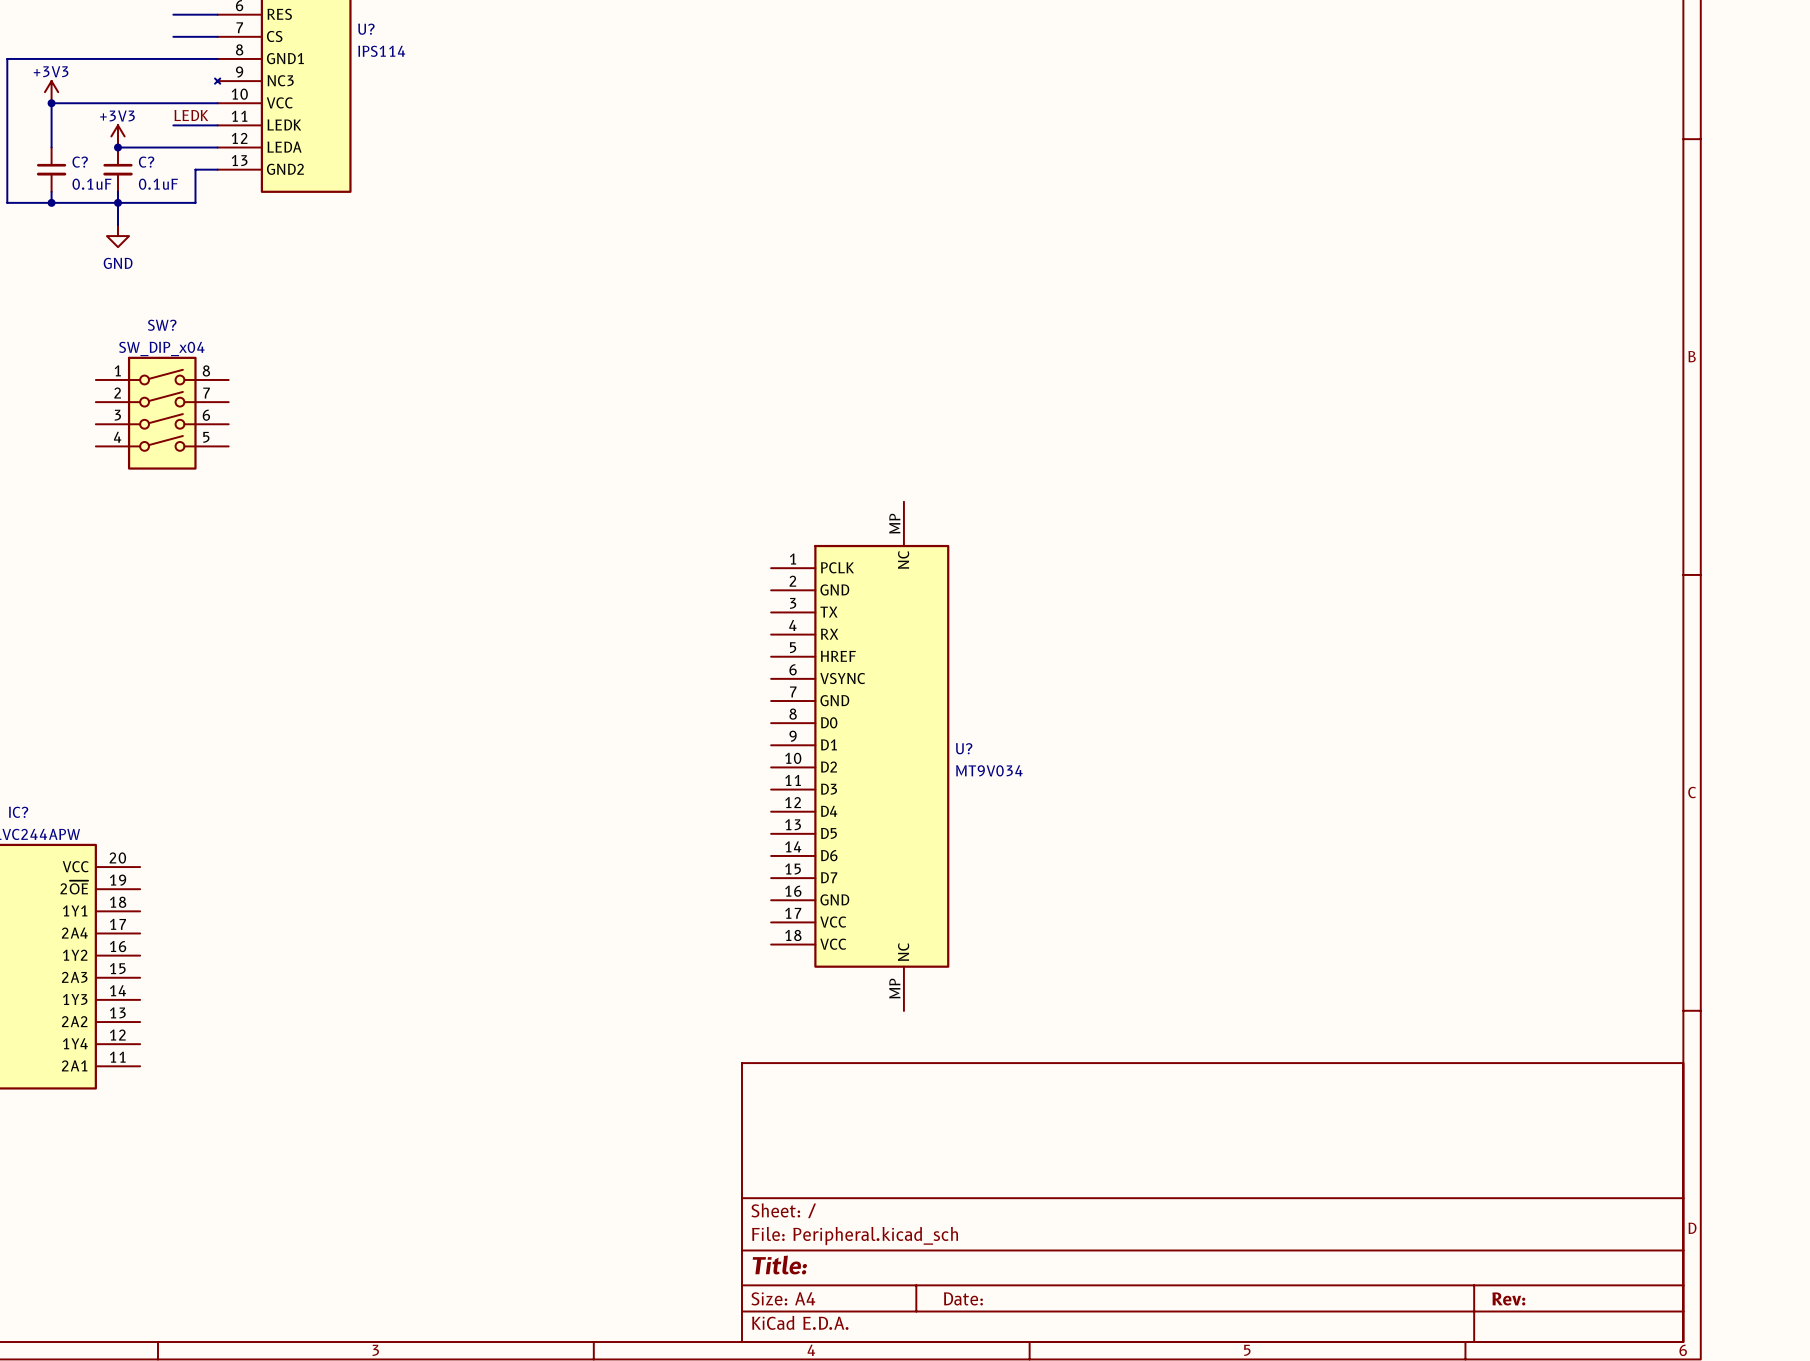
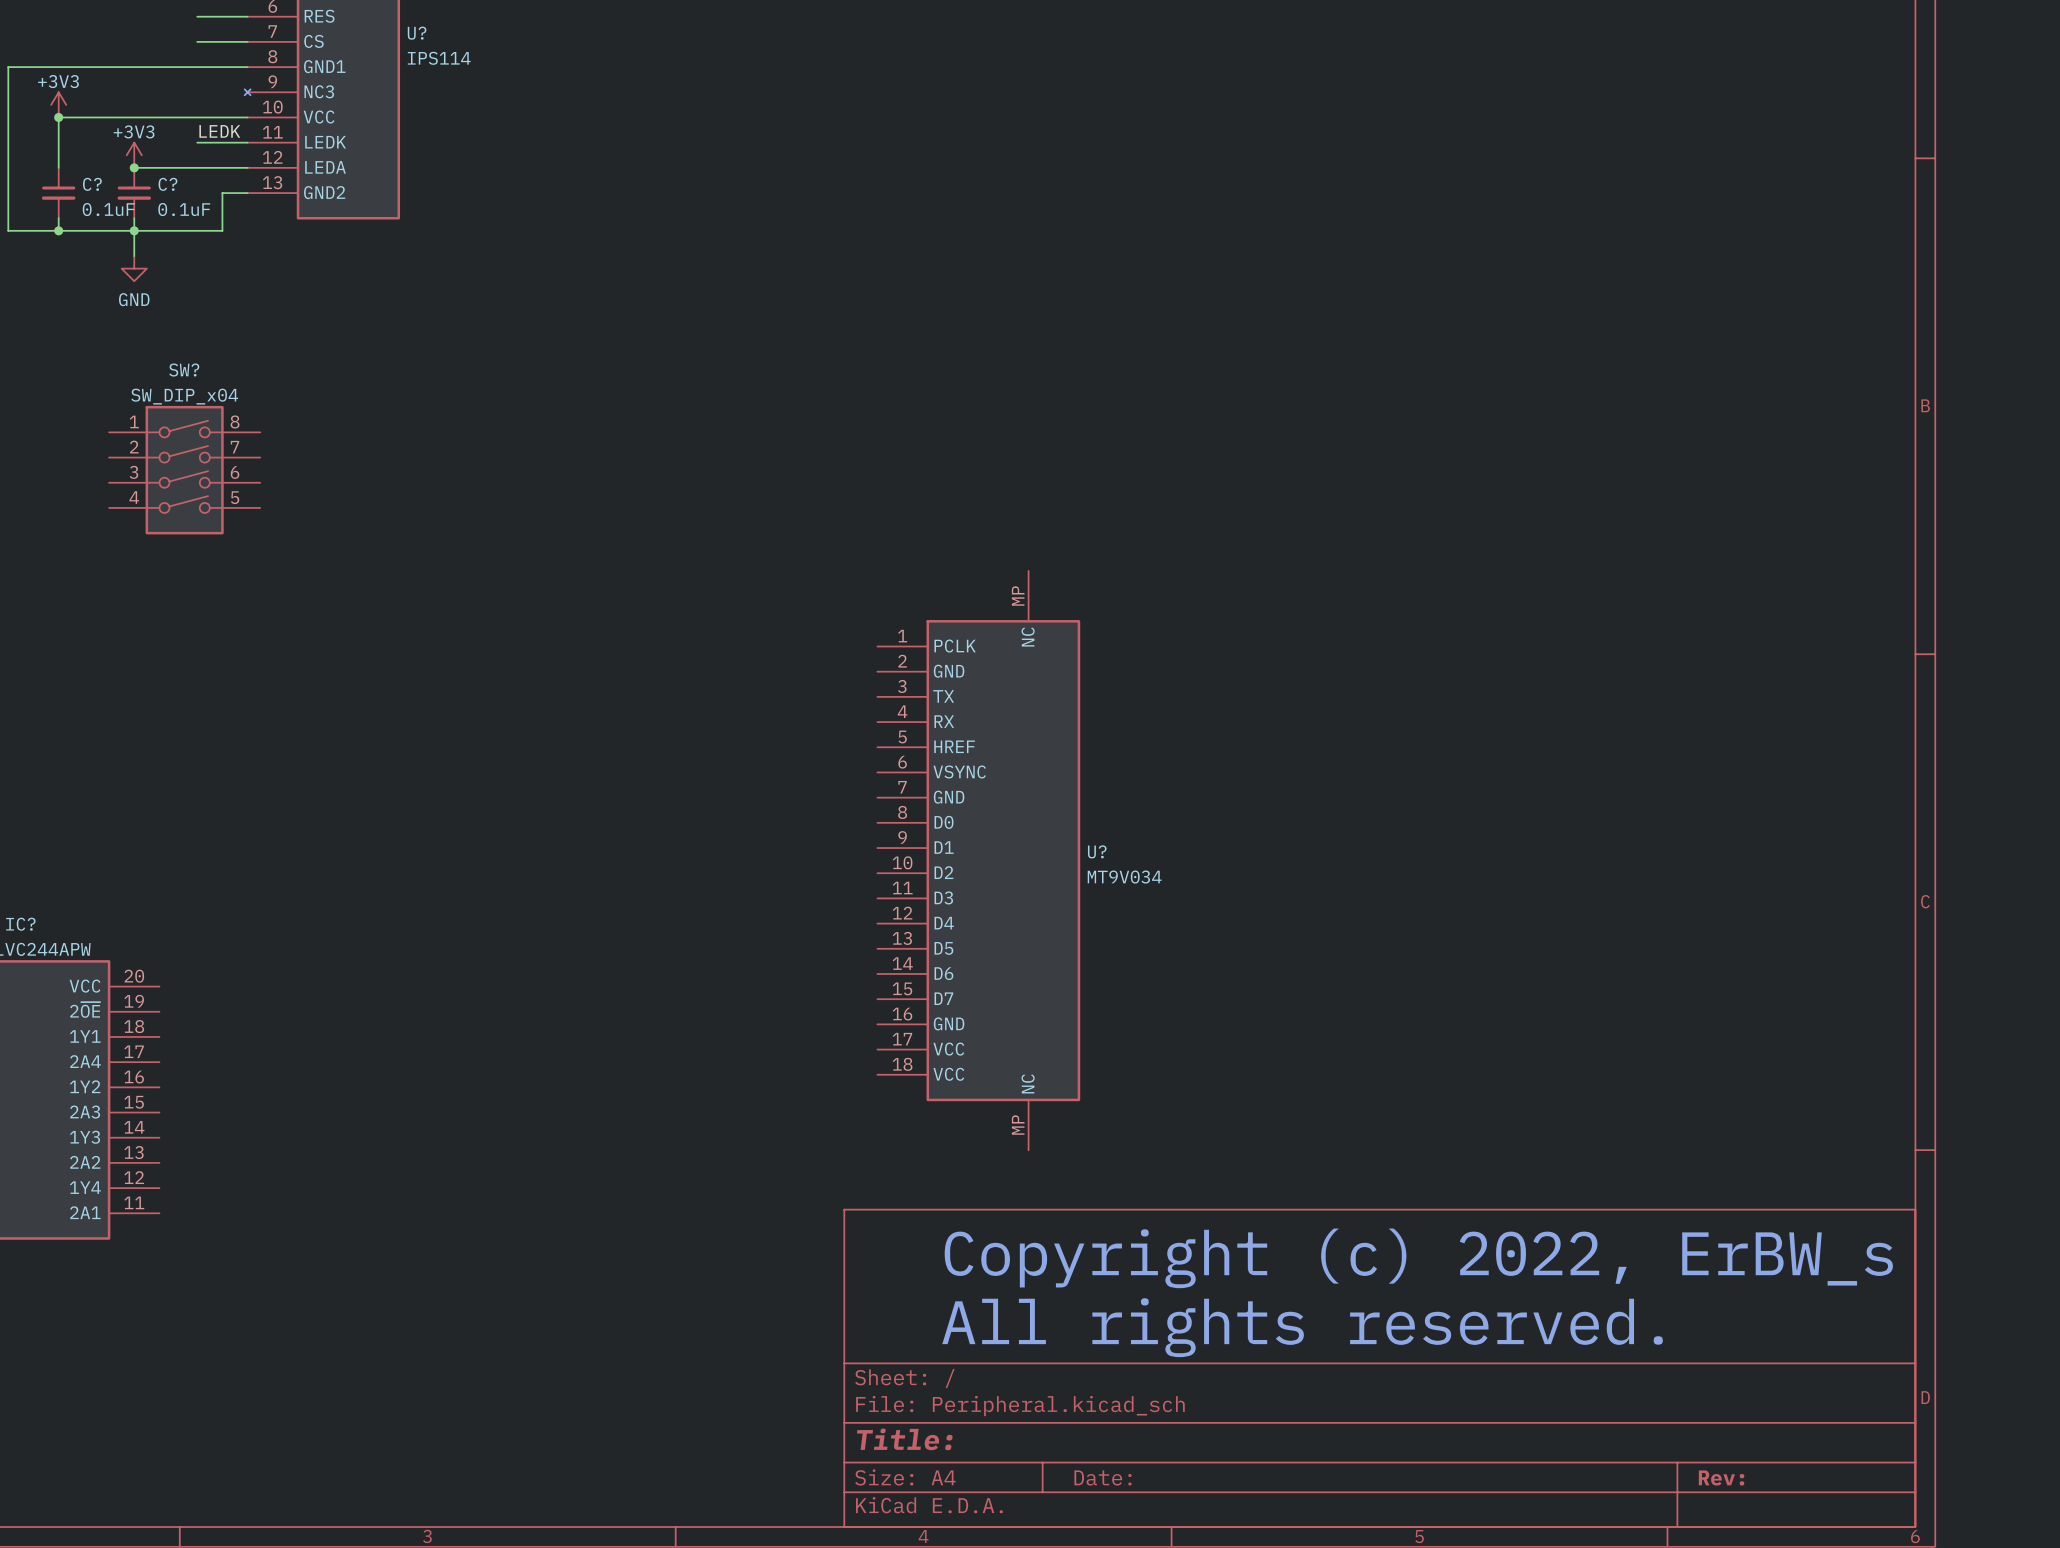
text: none -> Copyright (c) 2022, ErBW_s (1418, 1258)
text: none -> All rights reserved. (1302, 1327)

